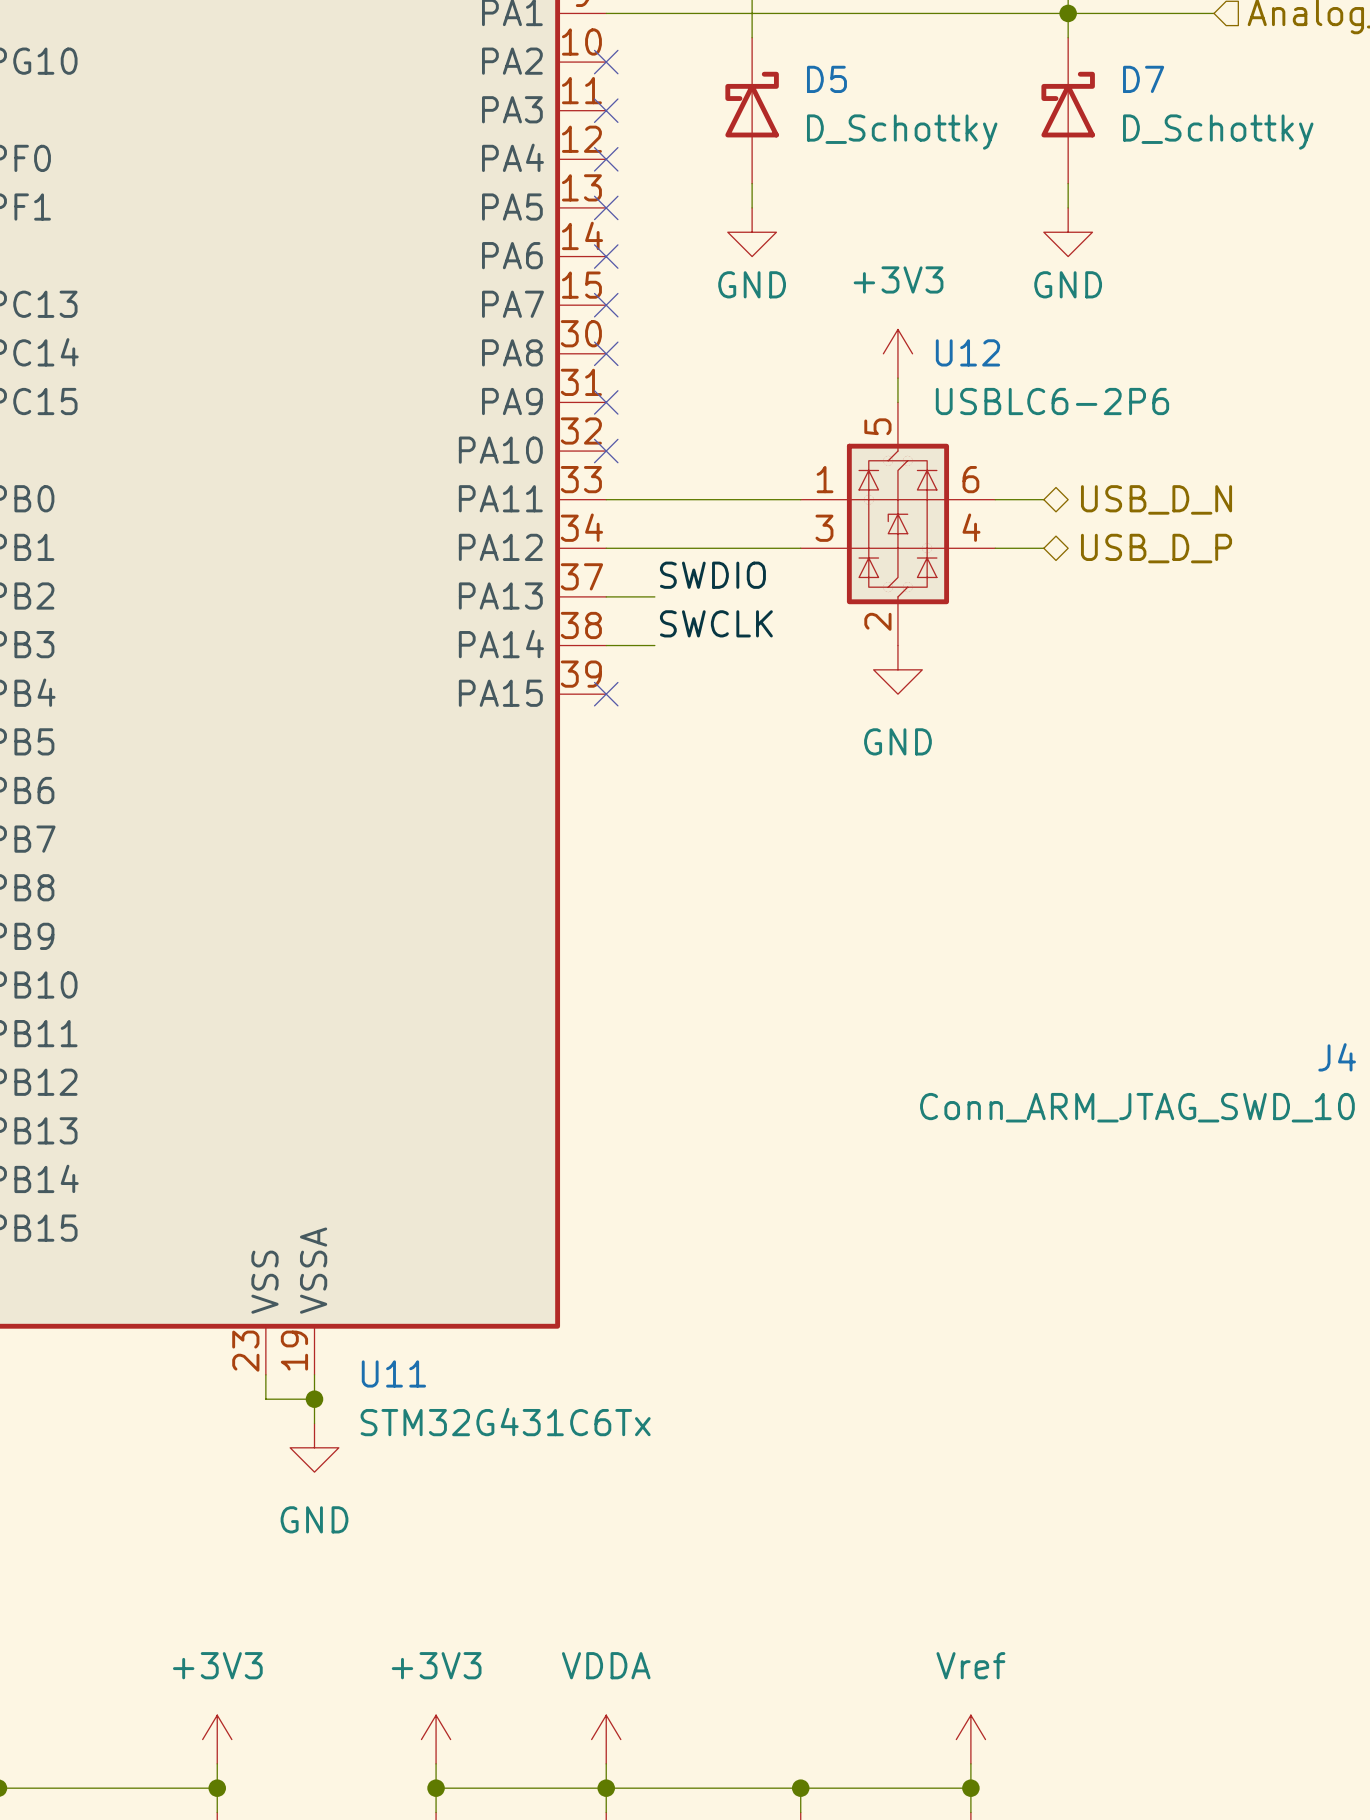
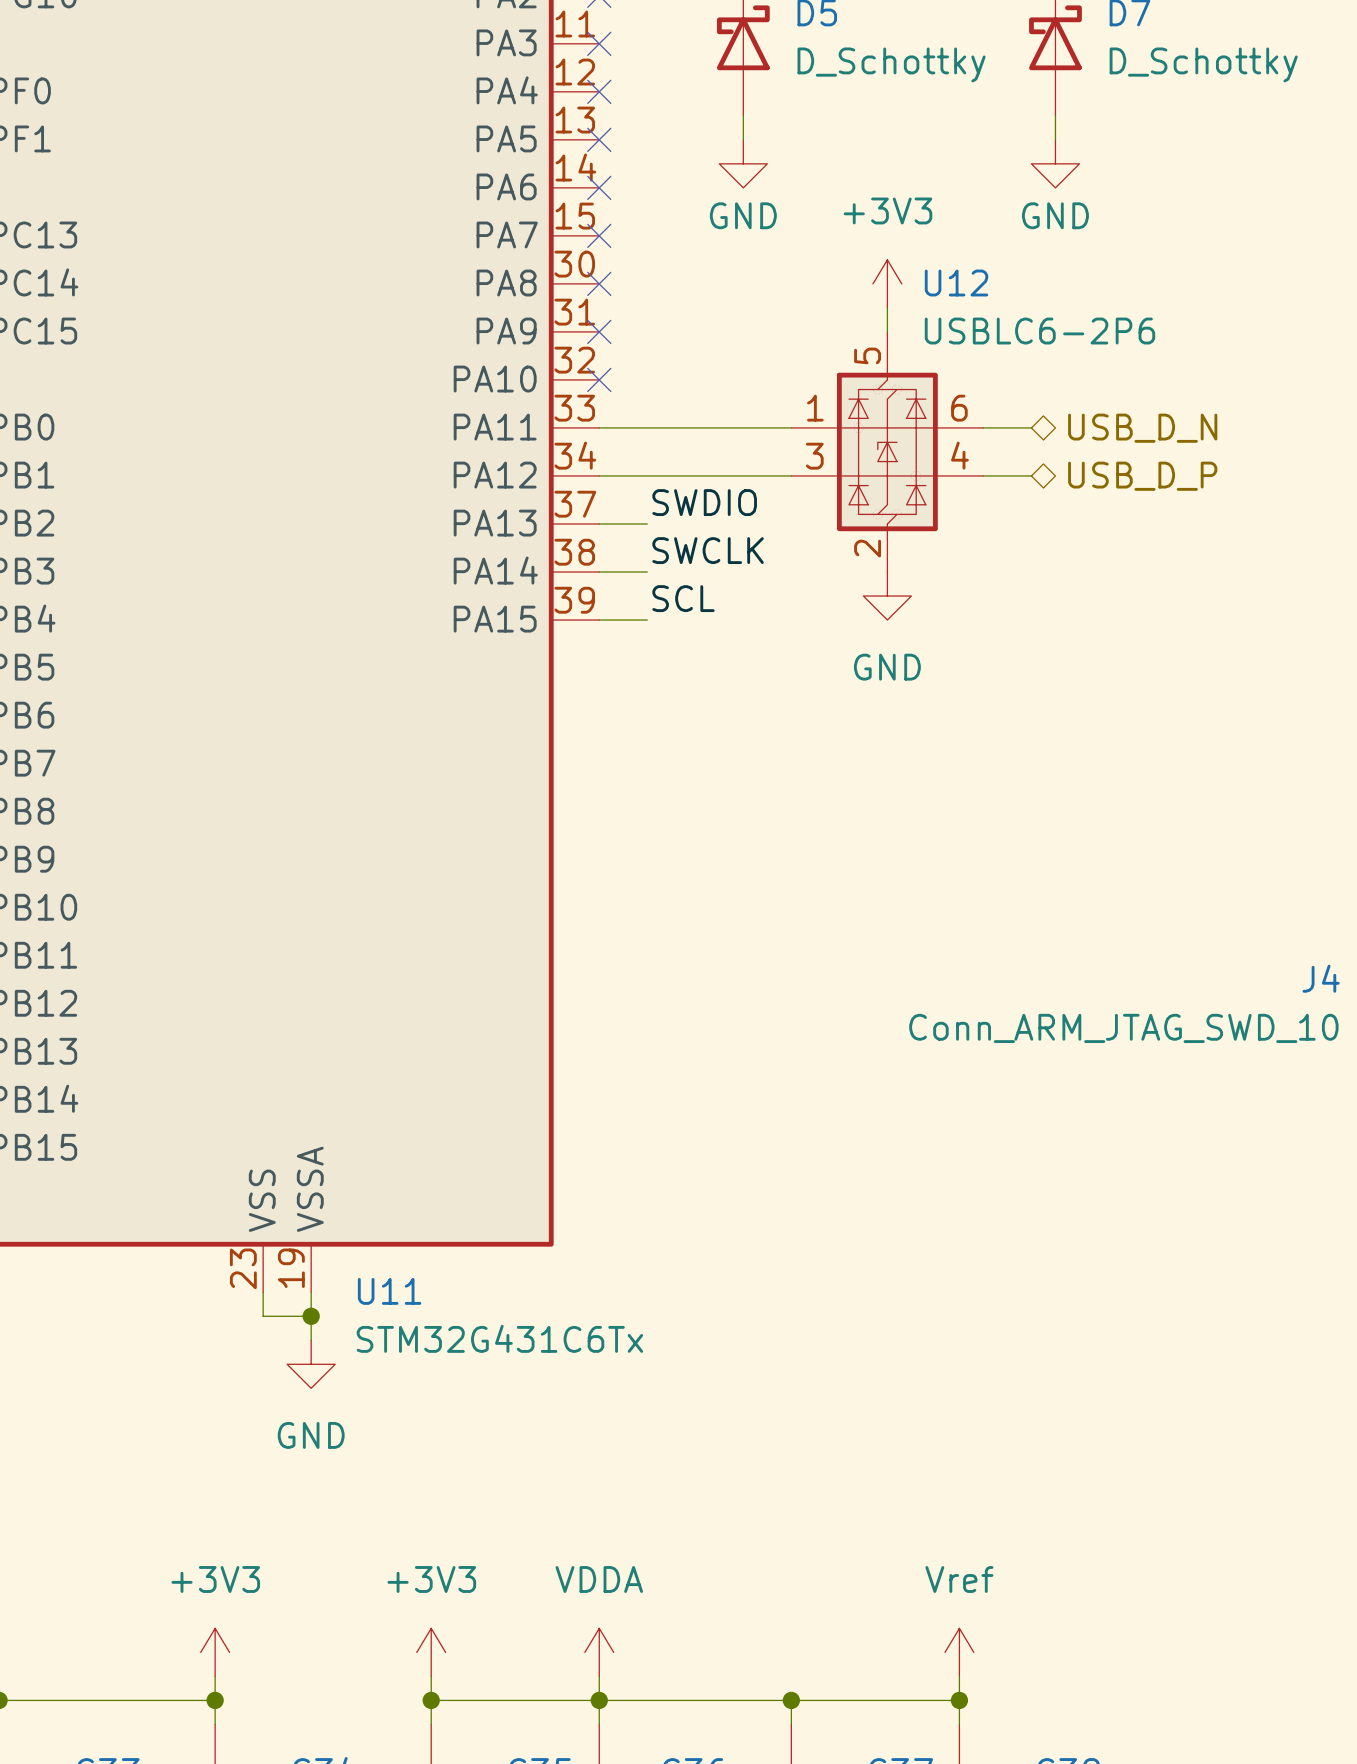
label: none -> SCL (683, 598)
wire: none -> (599, 620) (647, 620)
no-connect mark: (606, 694) -> none

